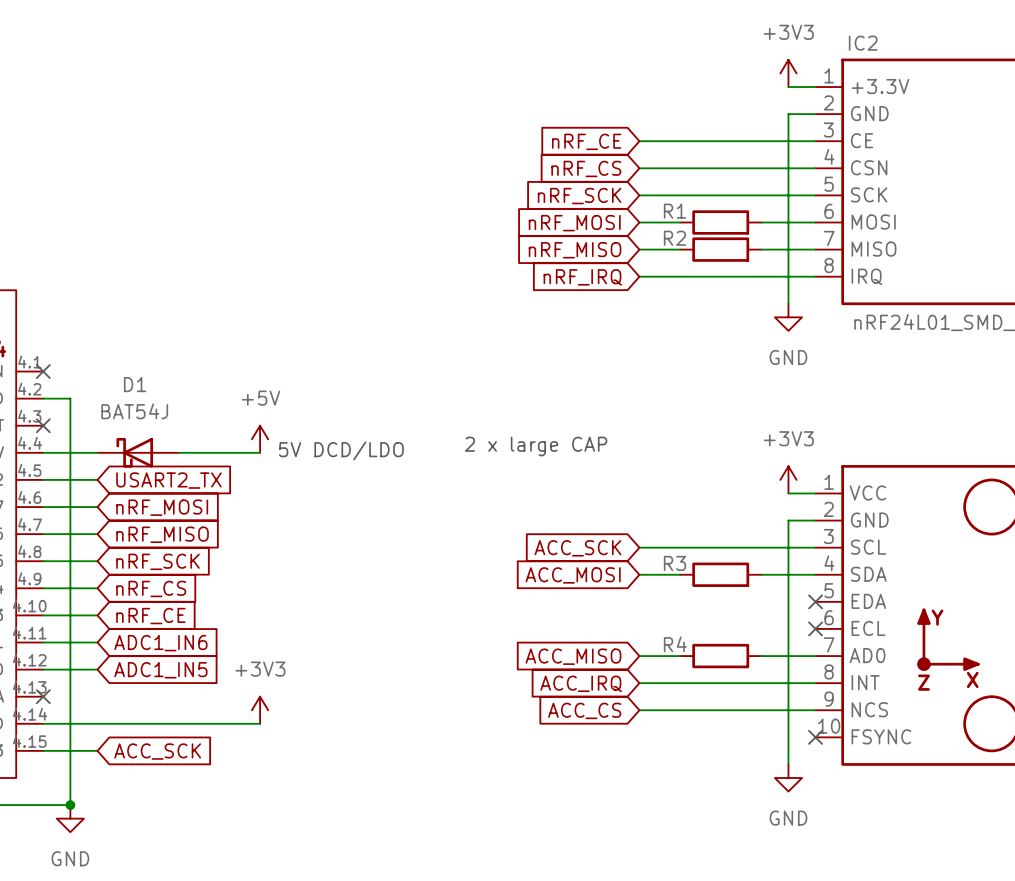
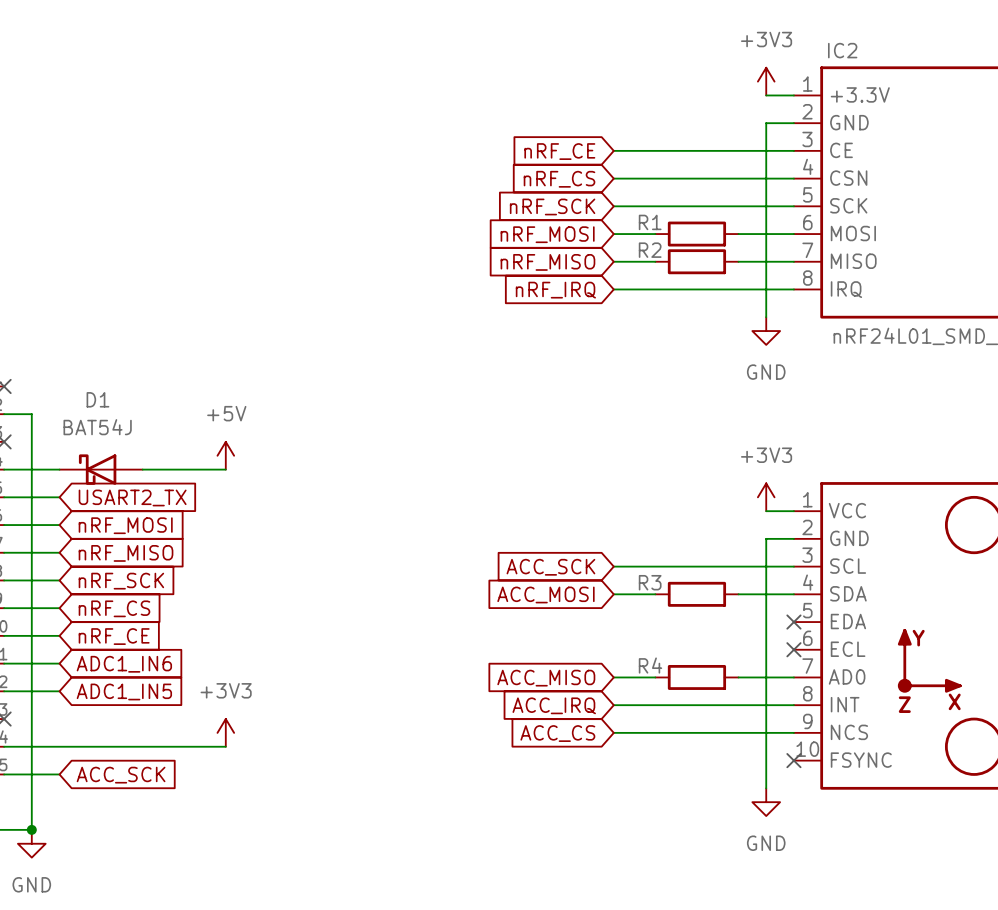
text: 2 x large CAP (536, 446) -> none
text: 5V DCD/LDO (341, 450) -> none

